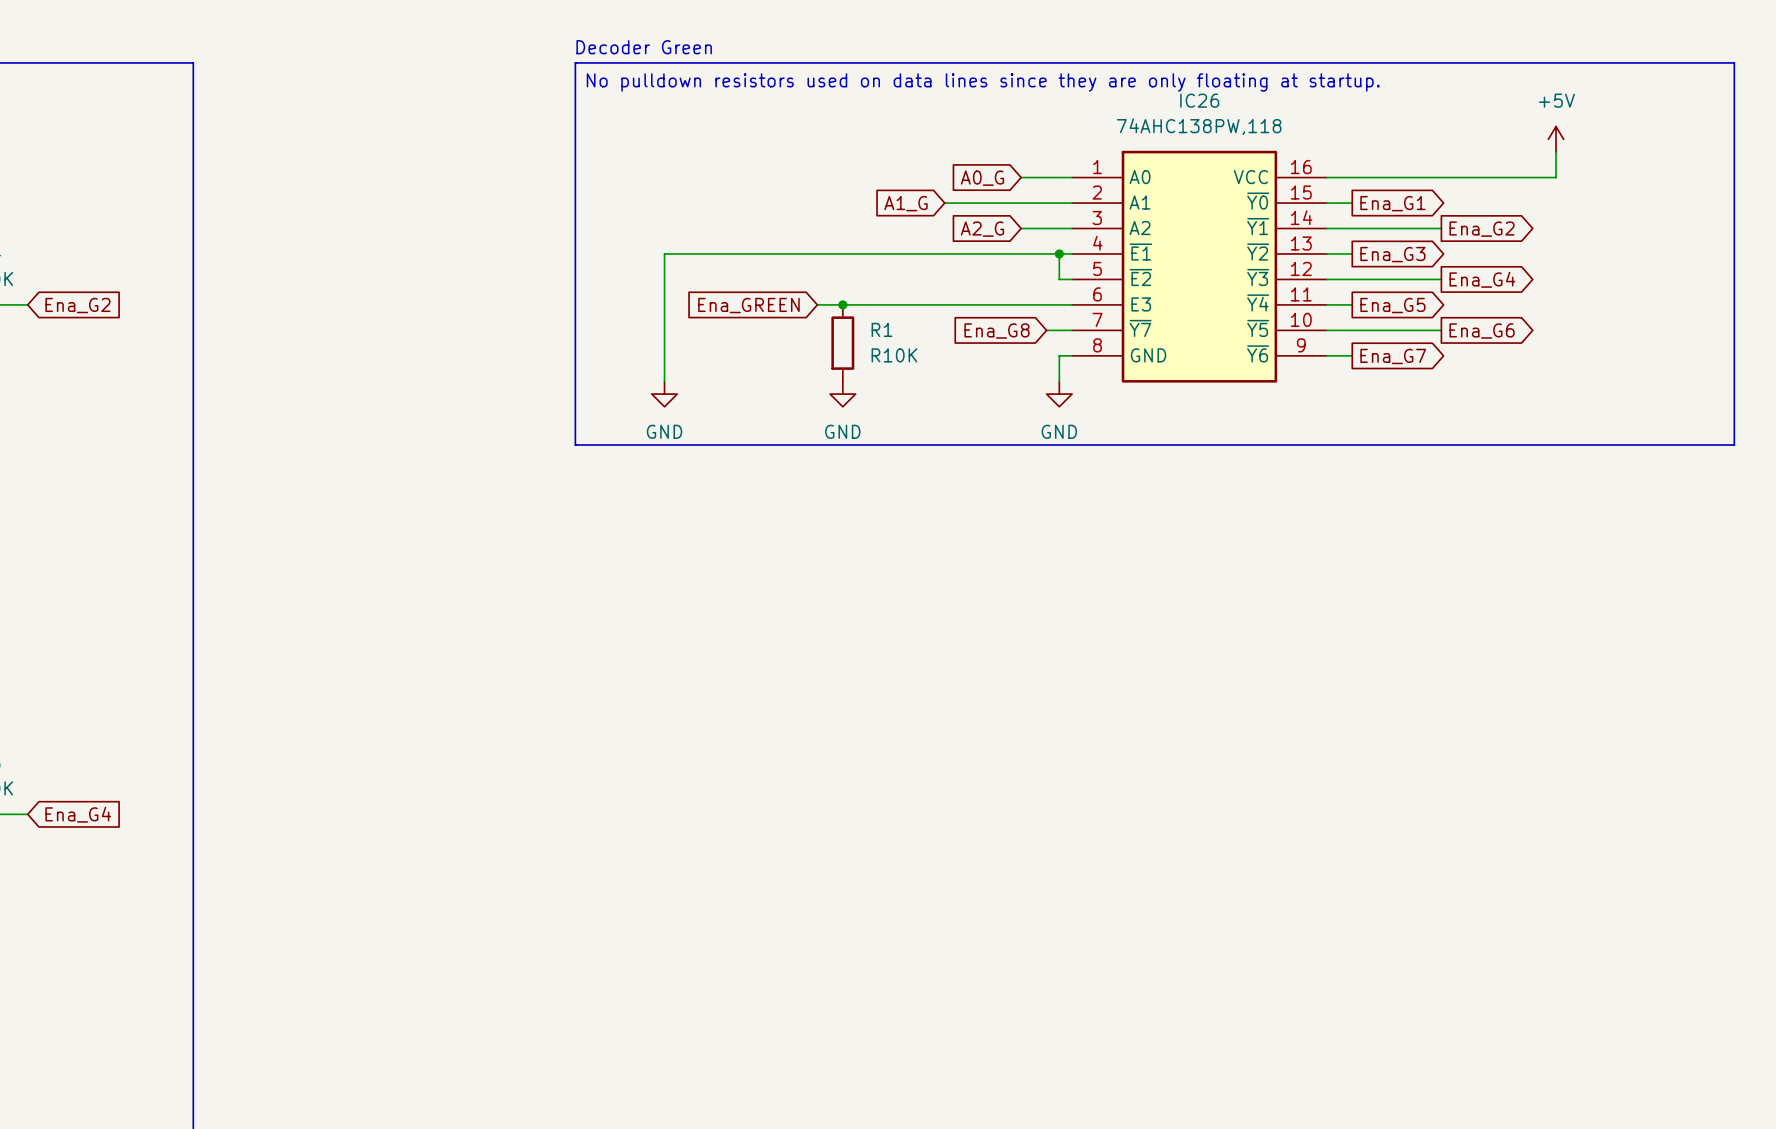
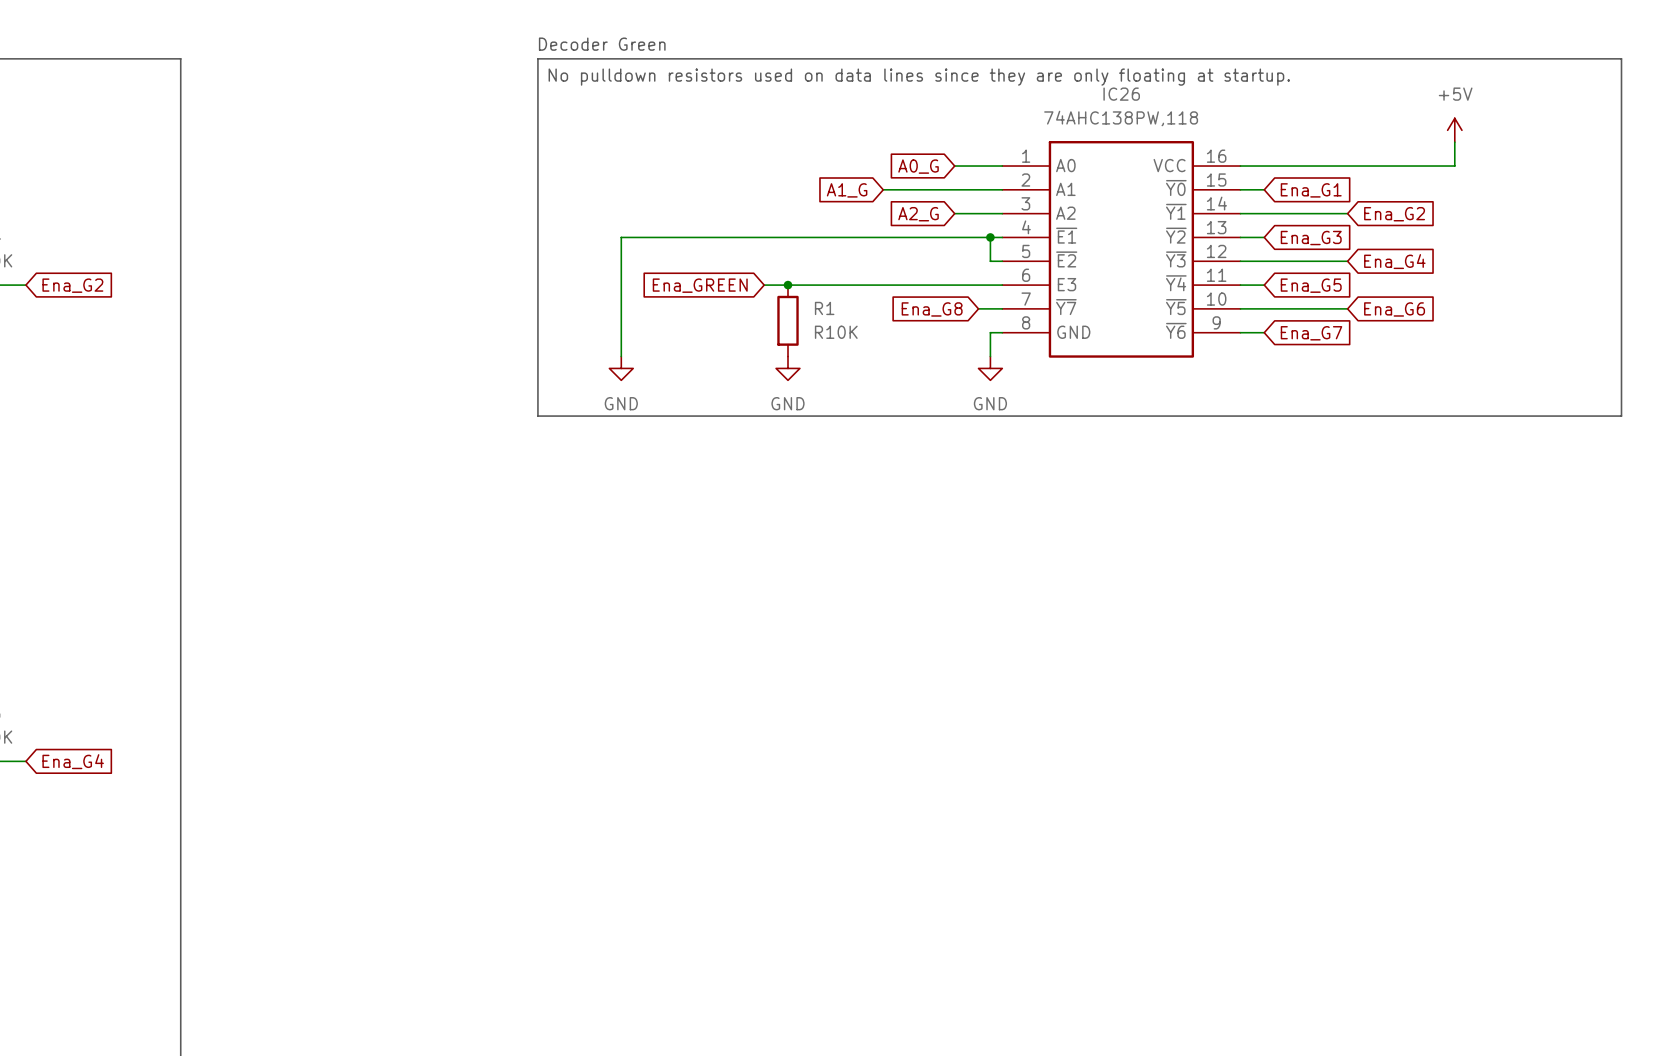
global label shape: output (1392, 203) -> input (1311, 190)
global label shape: output (1482, 229) -> input (1394, 214)
global label shape: output (1392, 254) -> input (1311, 238)
global label shape: output (1482, 279) -> input (1394, 261)
global label shape: output (1392, 305) -> input (1311, 285)
global label shape: output (1482, 331) -> input (1394, 309)
global label shape: output (1393, 356) -> input (1311, 333)

